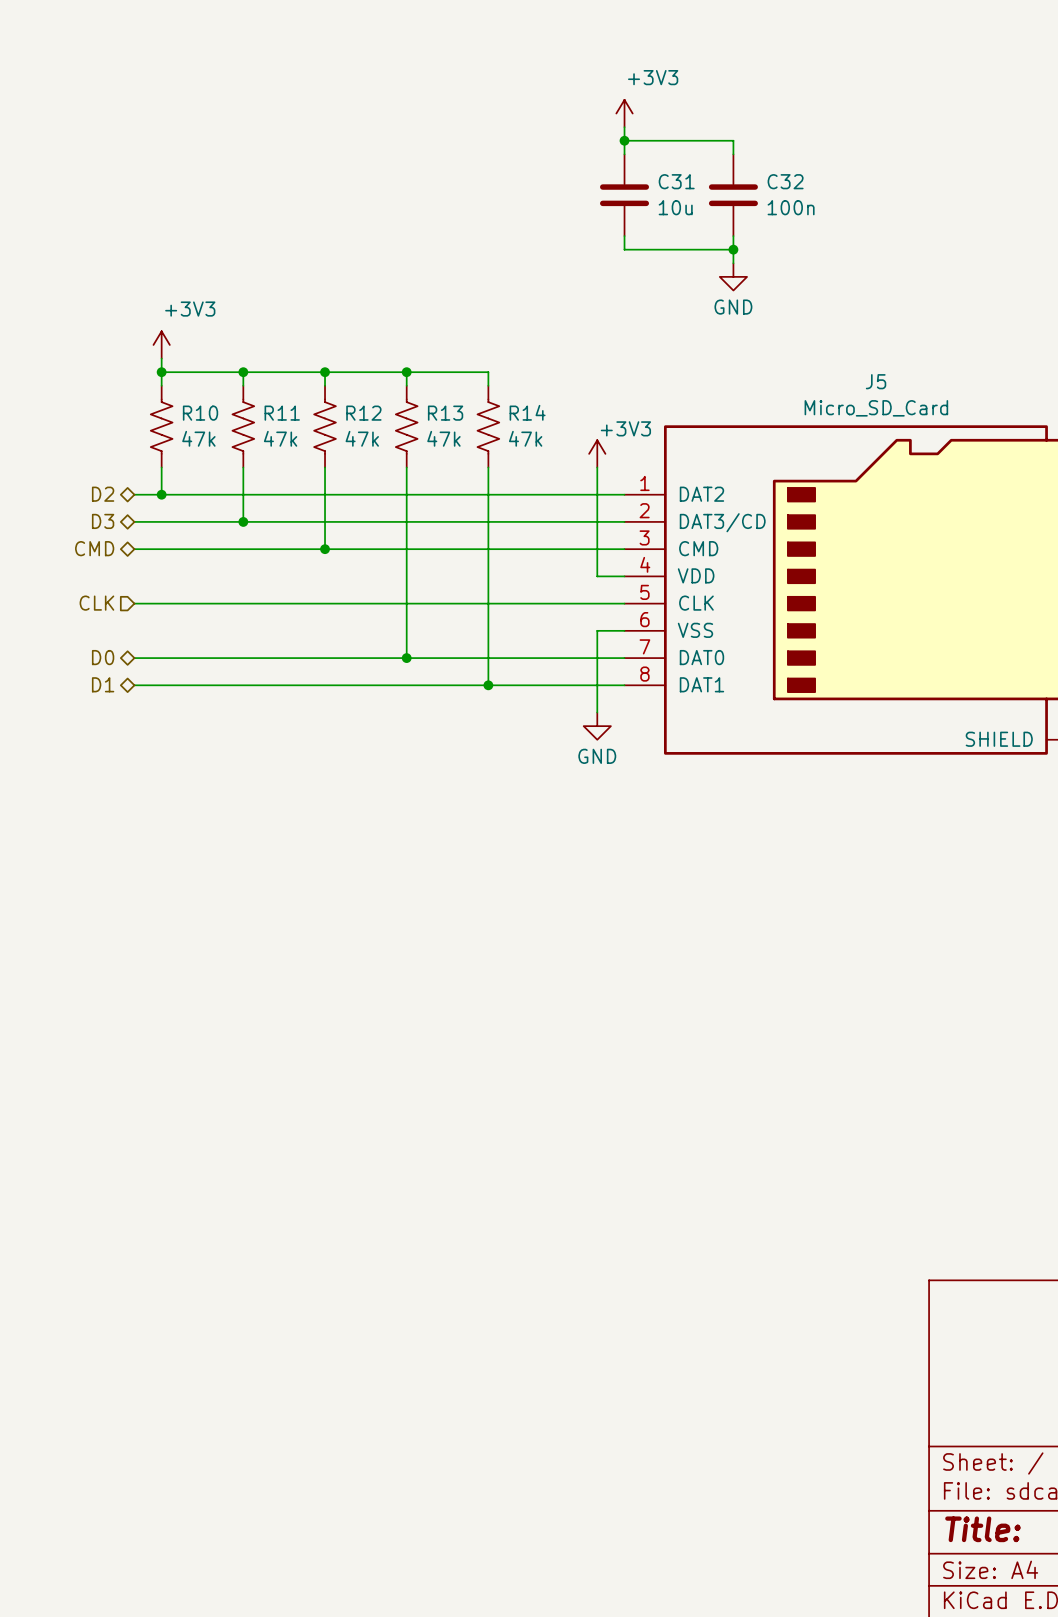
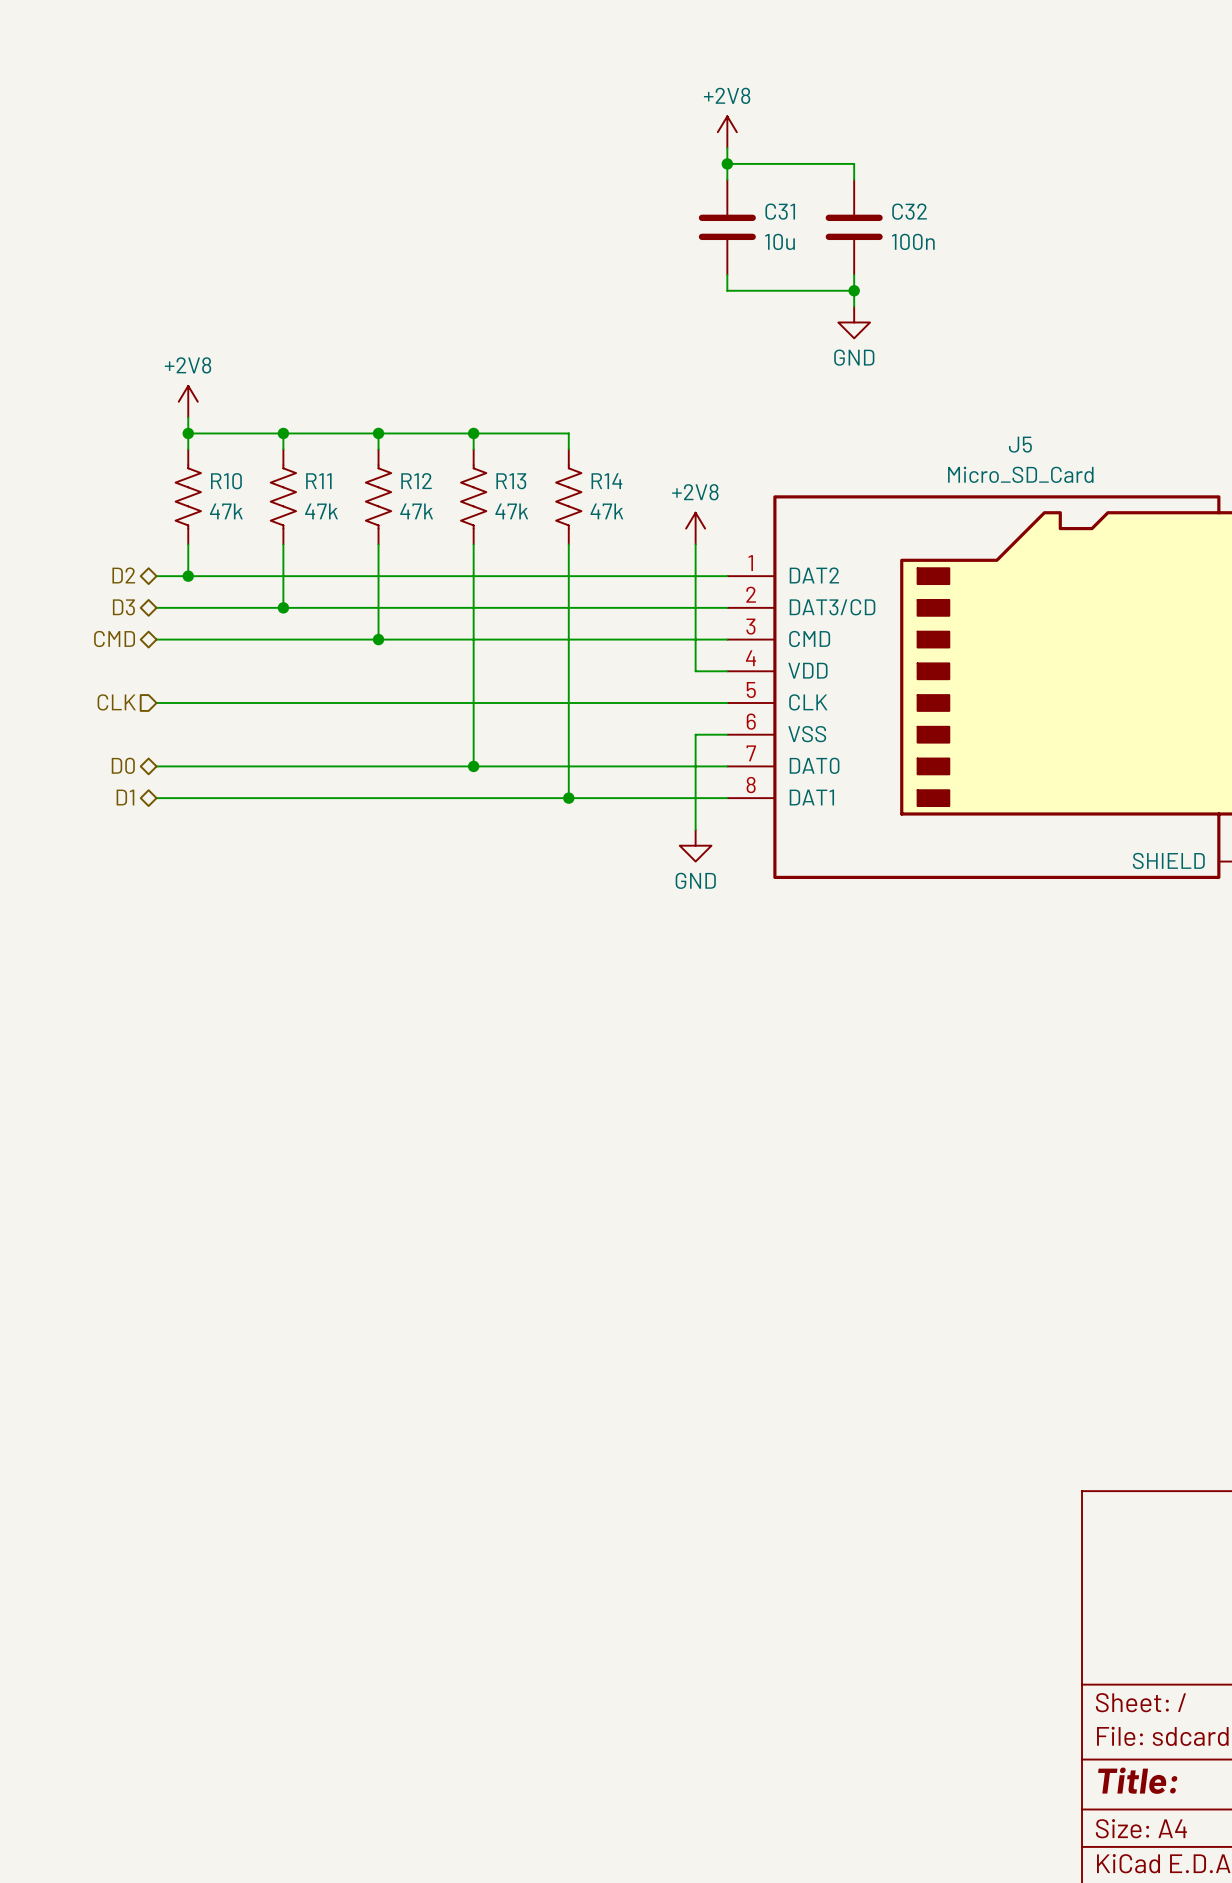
power symbol: +3V3 (624, 113) -> +2V8 (727, 132)
power symbol: +3V3 (161, 344) -> +2V8 (188, 401)
power symbol: +3V3 (597, 453) -> +2V8 (695, 528)

